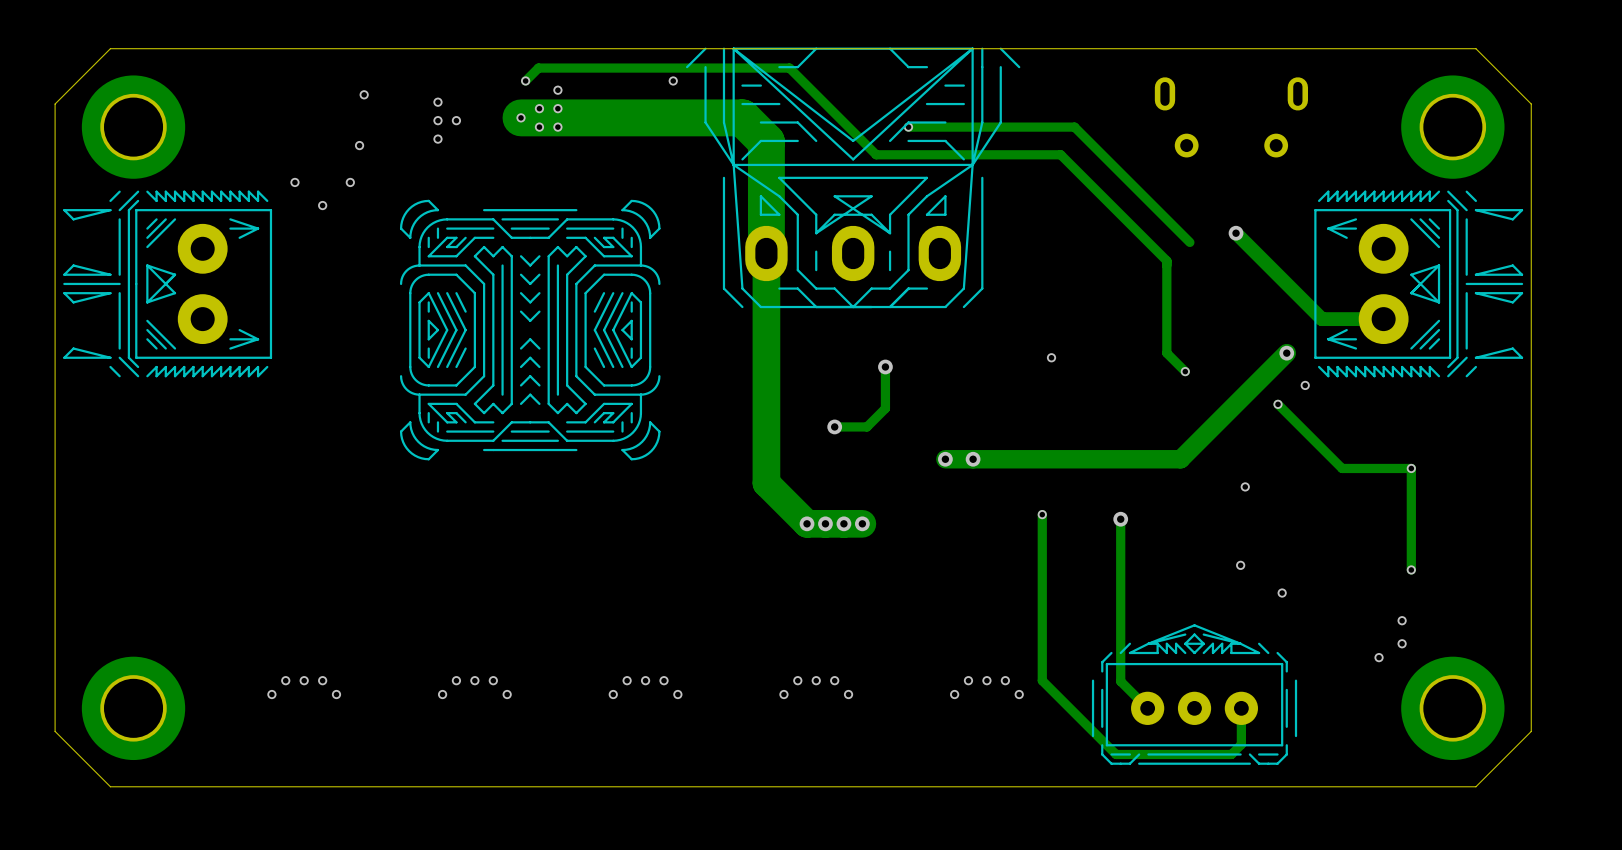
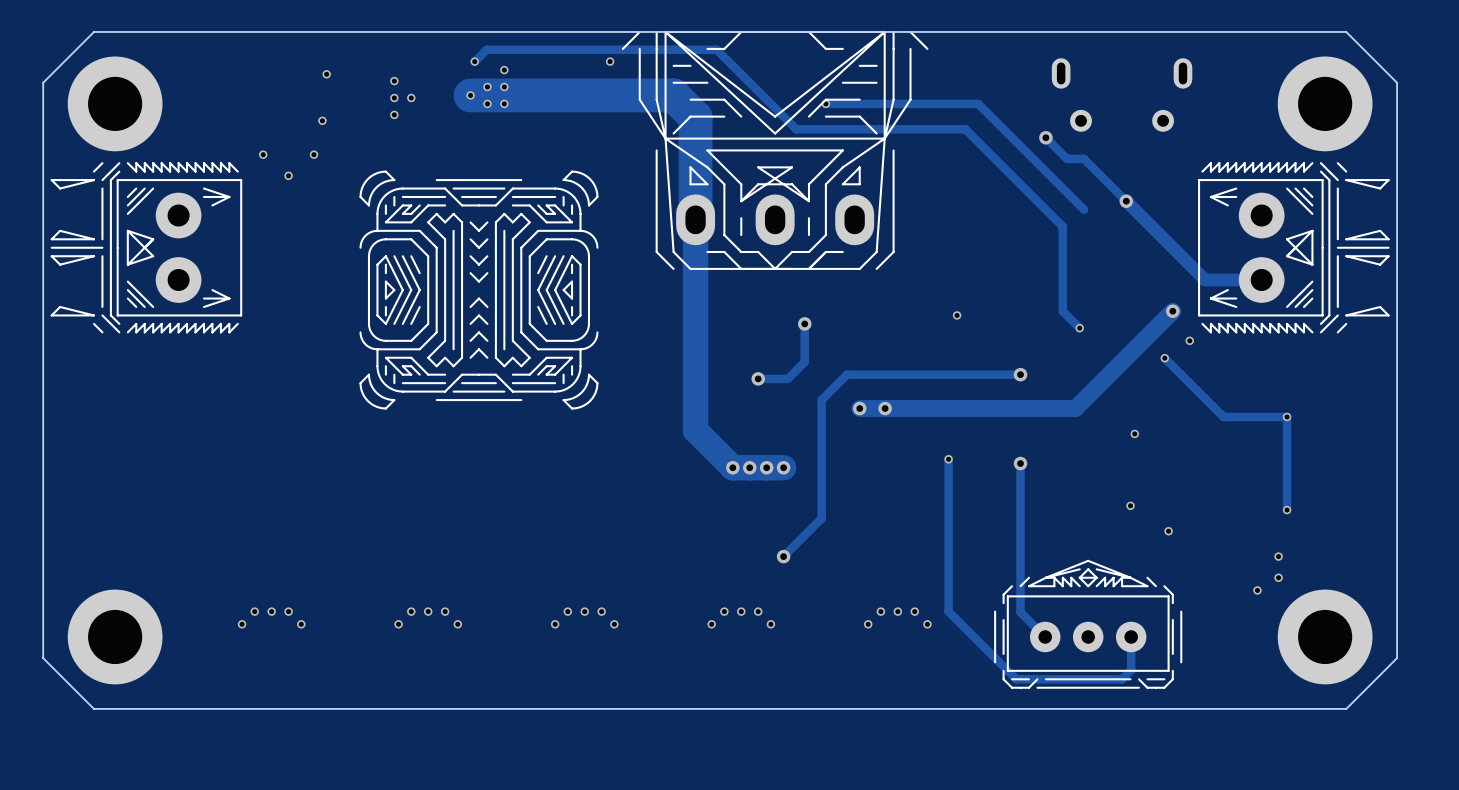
track: none -> (1045, 137) (1067, 158) (1083, 158) (1126, 201)
via: none -> (1045, 137)
track: none -> (1020, 374) (847, 374) (821, 400) (821, 518) (783, 556)
via: none -> (1020, 374)
via: none -> (783, 556)

